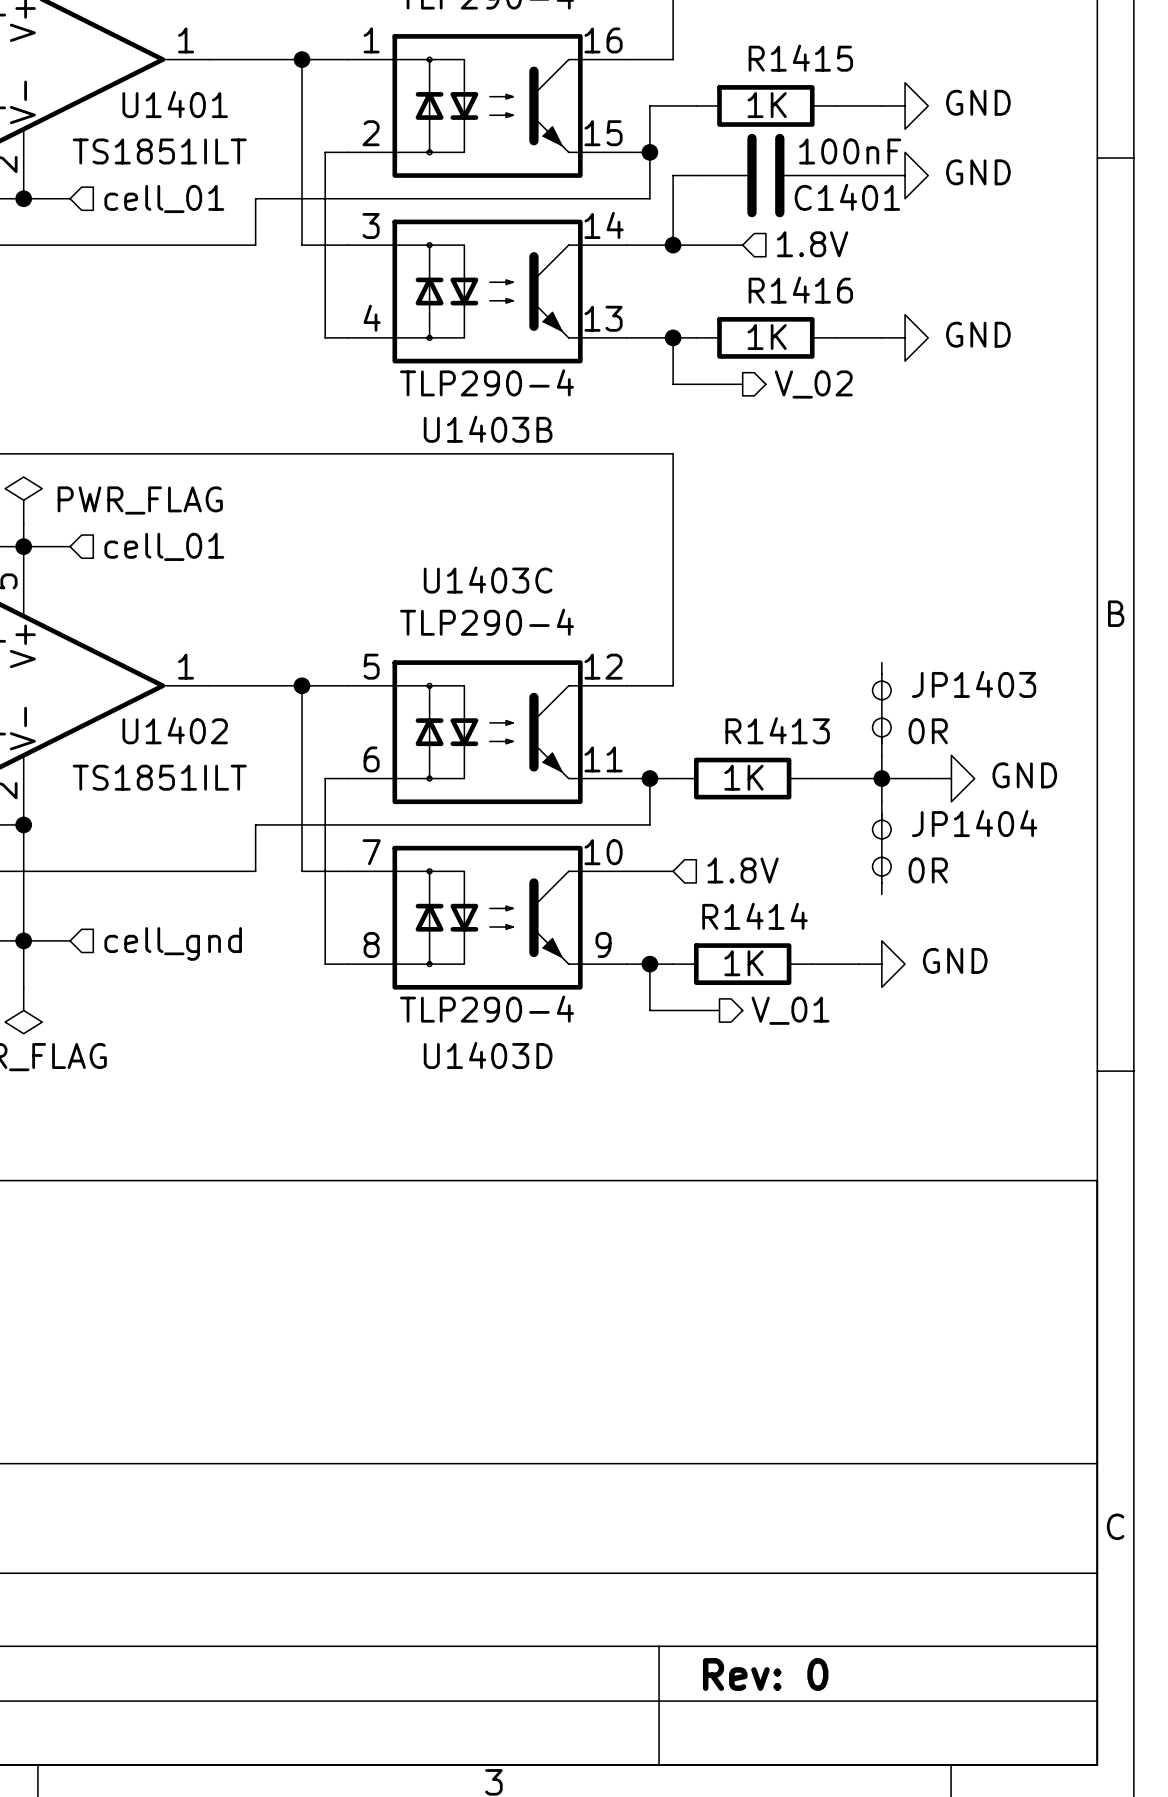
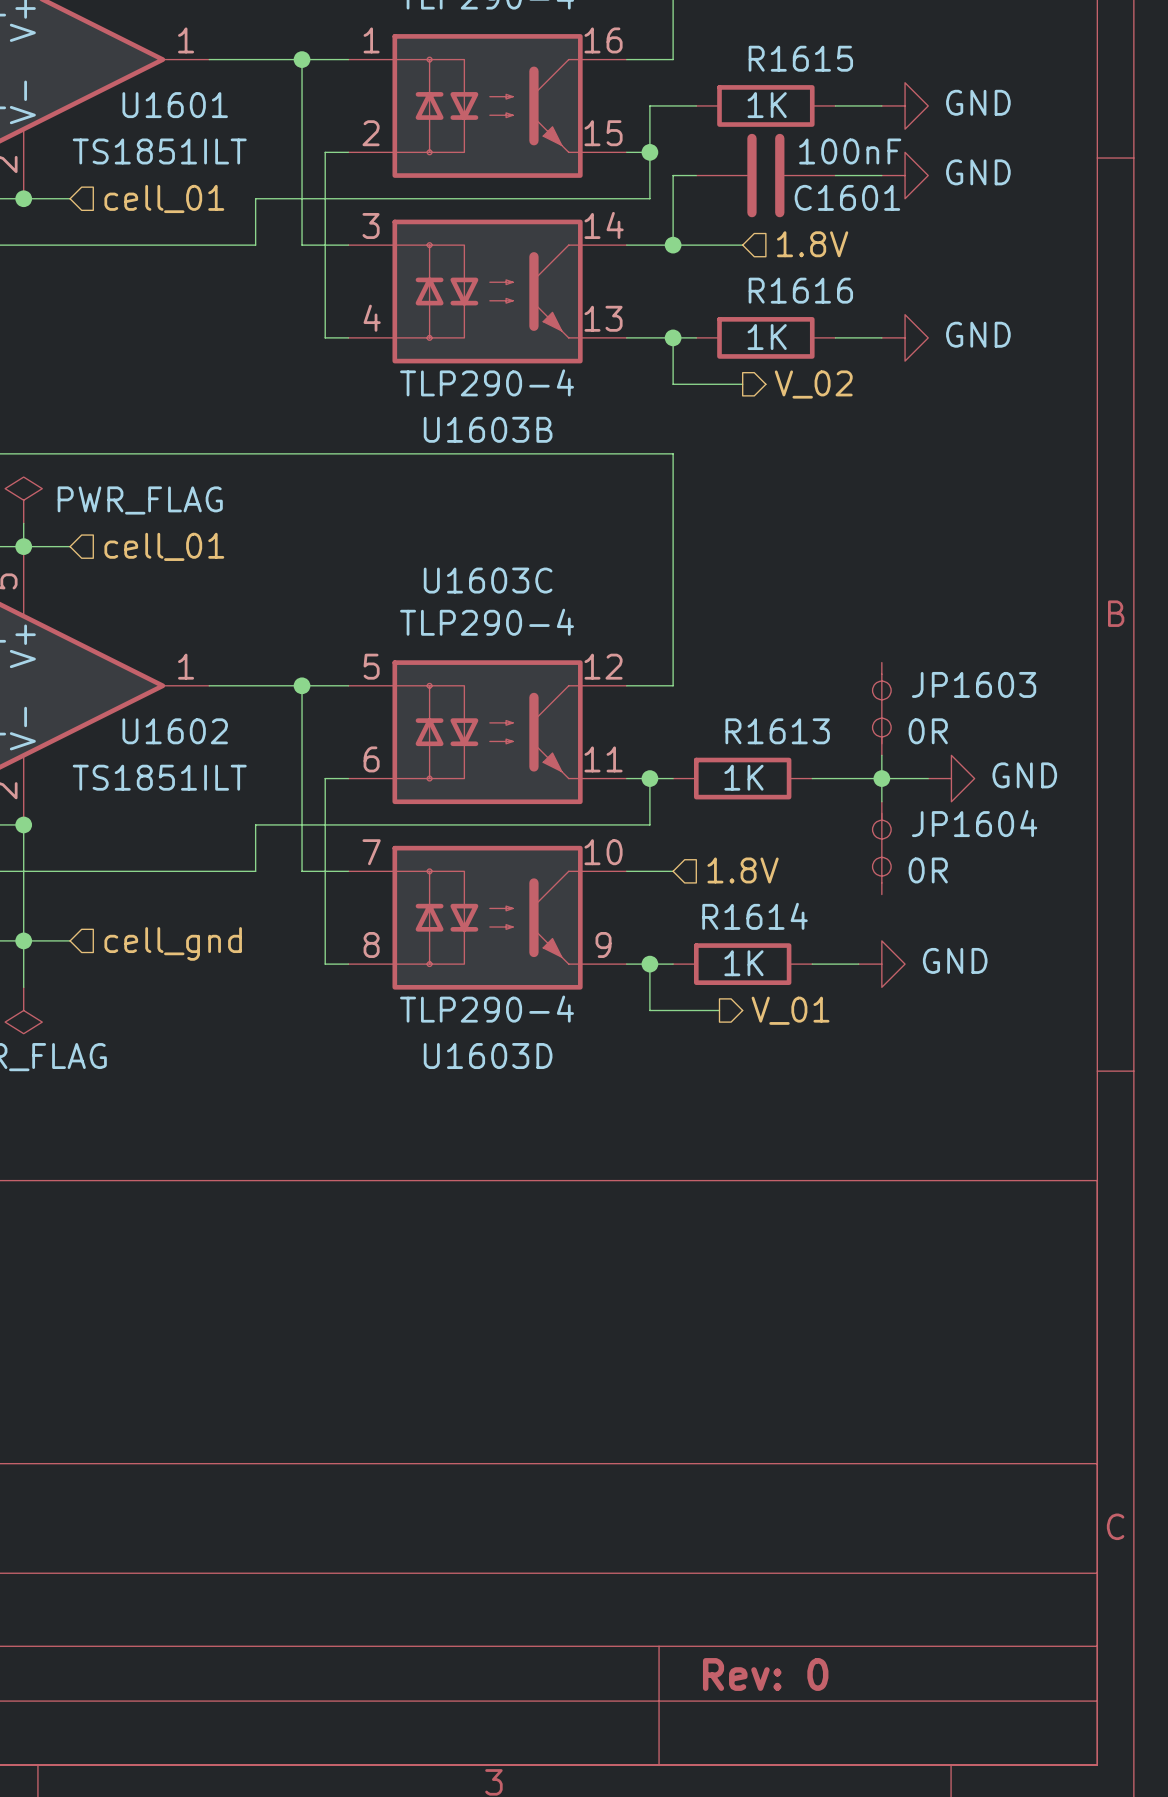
R1415 name: R1415 (800, 58) -> R1615 (800, 58)
U1401 name: U1401 (175, 104) -> U1601 (175, 105)
C1401 name: C1401 (847, 197) -> C1601 (847, 197)
R1416 name: R1416 (800, 290) -> R1616 (800, 290)
U1403B name: U1403B (488, 429) -> U1603B (488, 429)
U1403C name: U1403C (488, 580) -> U1603C (488, 580)
JP1403 name: JP1403 (974, 684) -> JP1603 (974, 684)
U1402 name: U1402 (175, 730) -> U1602 (175, 731)
R1413 name: R1413 (777, 730) -> R1613 (777, 731)
JP1404 name: JP1404 (974, 823) -> JP1604 (974, 823)
R1414 name: R1414 (755, 916) -> R1614 (755, 916)
U1403D name: U1403D (488, 1055) -> U1603D (488, 1056)

